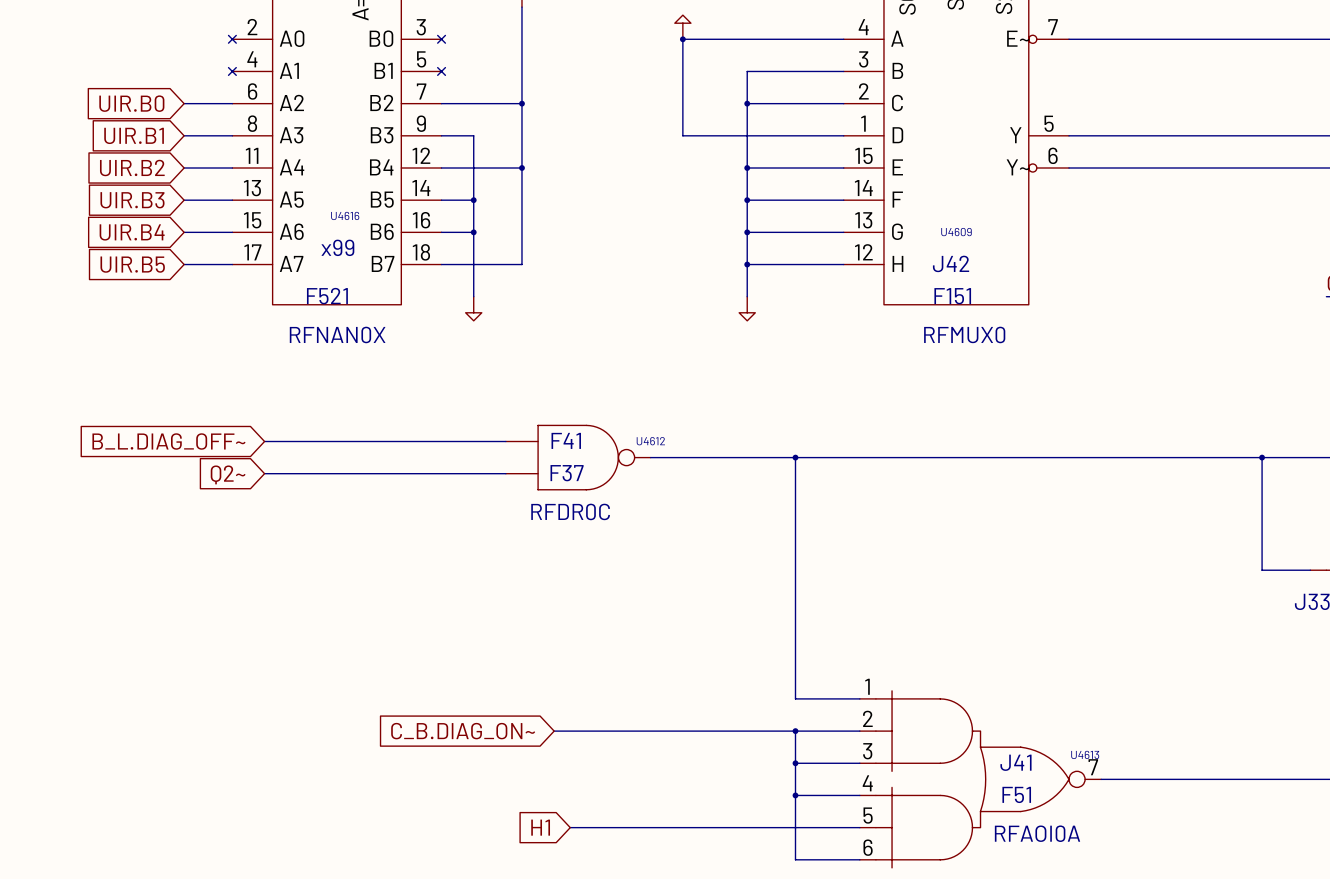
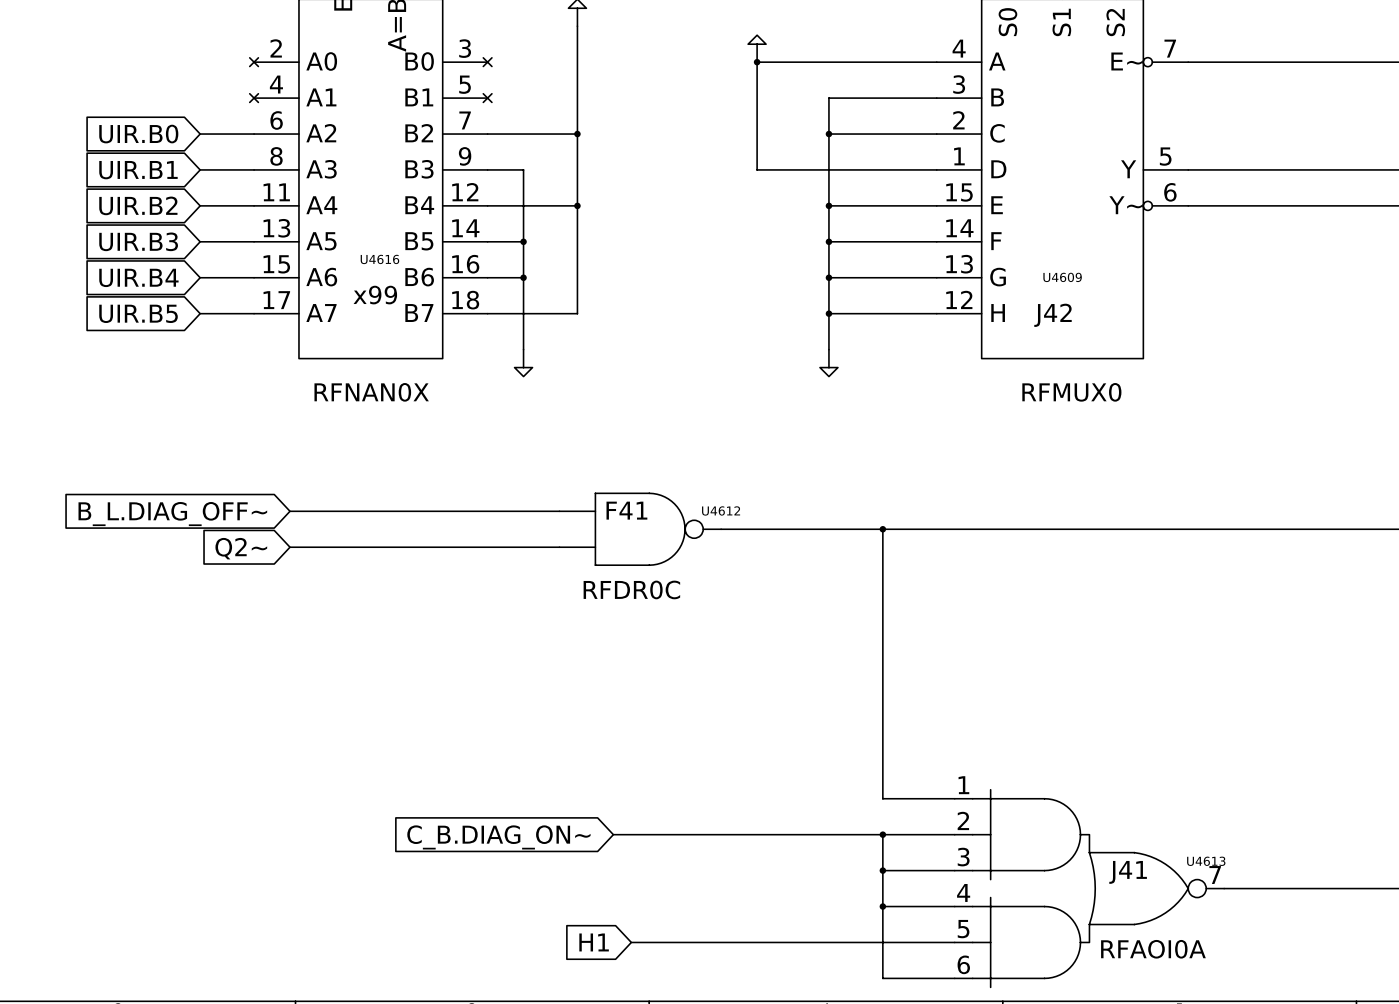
U4616 value: F521 (327, 296) -> none
U4609 value: F151 (952, 296) -> none
U4612 value: F37 (567, 473) -> none
U4613 value: F51 (1016, 794) -> none

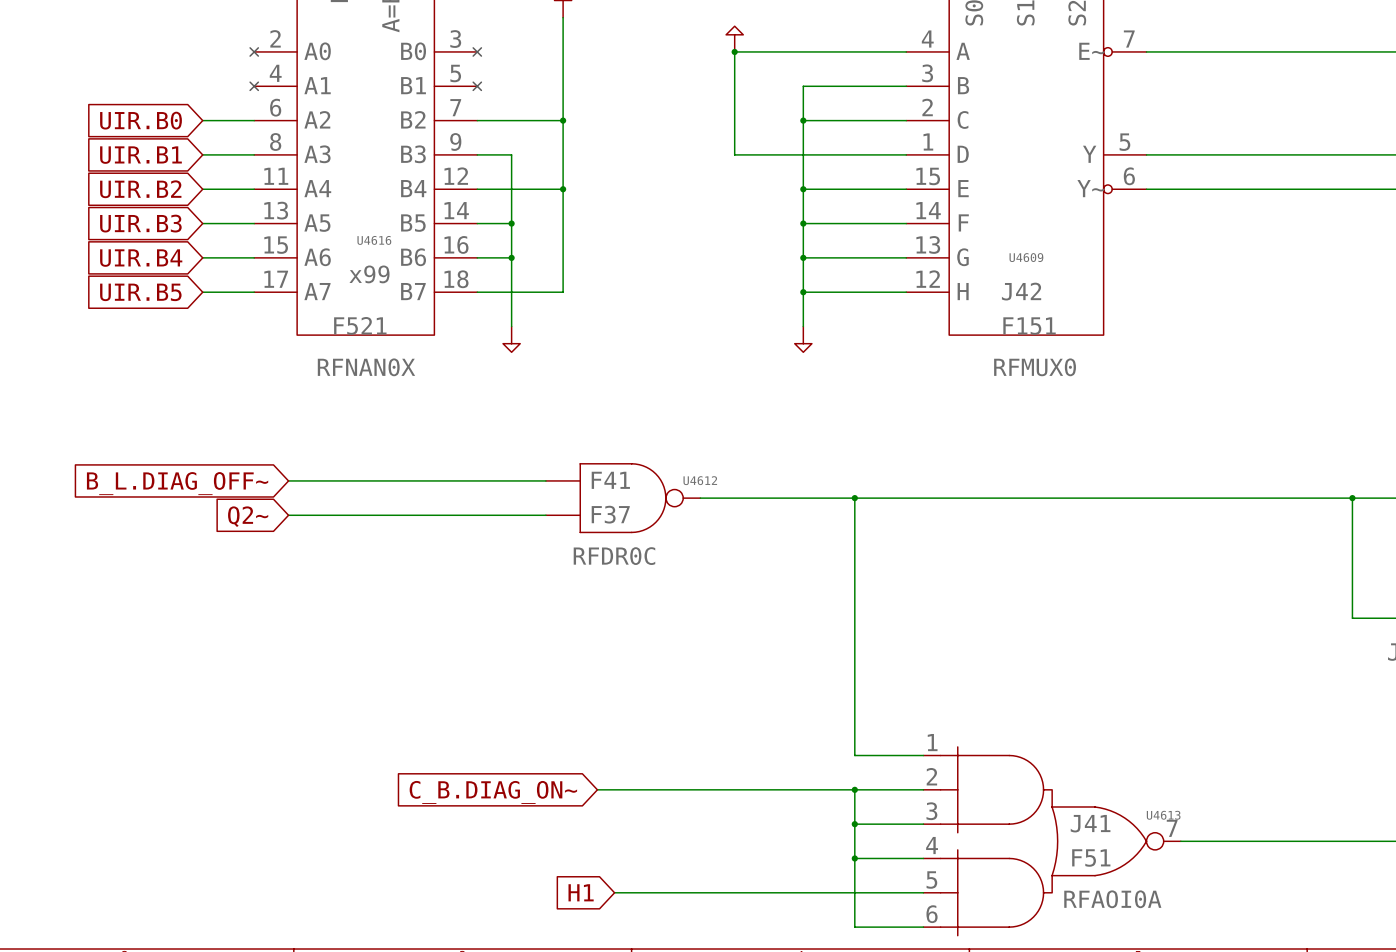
U4616 value: none -> F521 (360, 325)
U4609 value: none -> F151 (1029, 326)
U4612 value: none -> F37 (610, 514)
U4613 value: none -> F51 (1091, 858)

